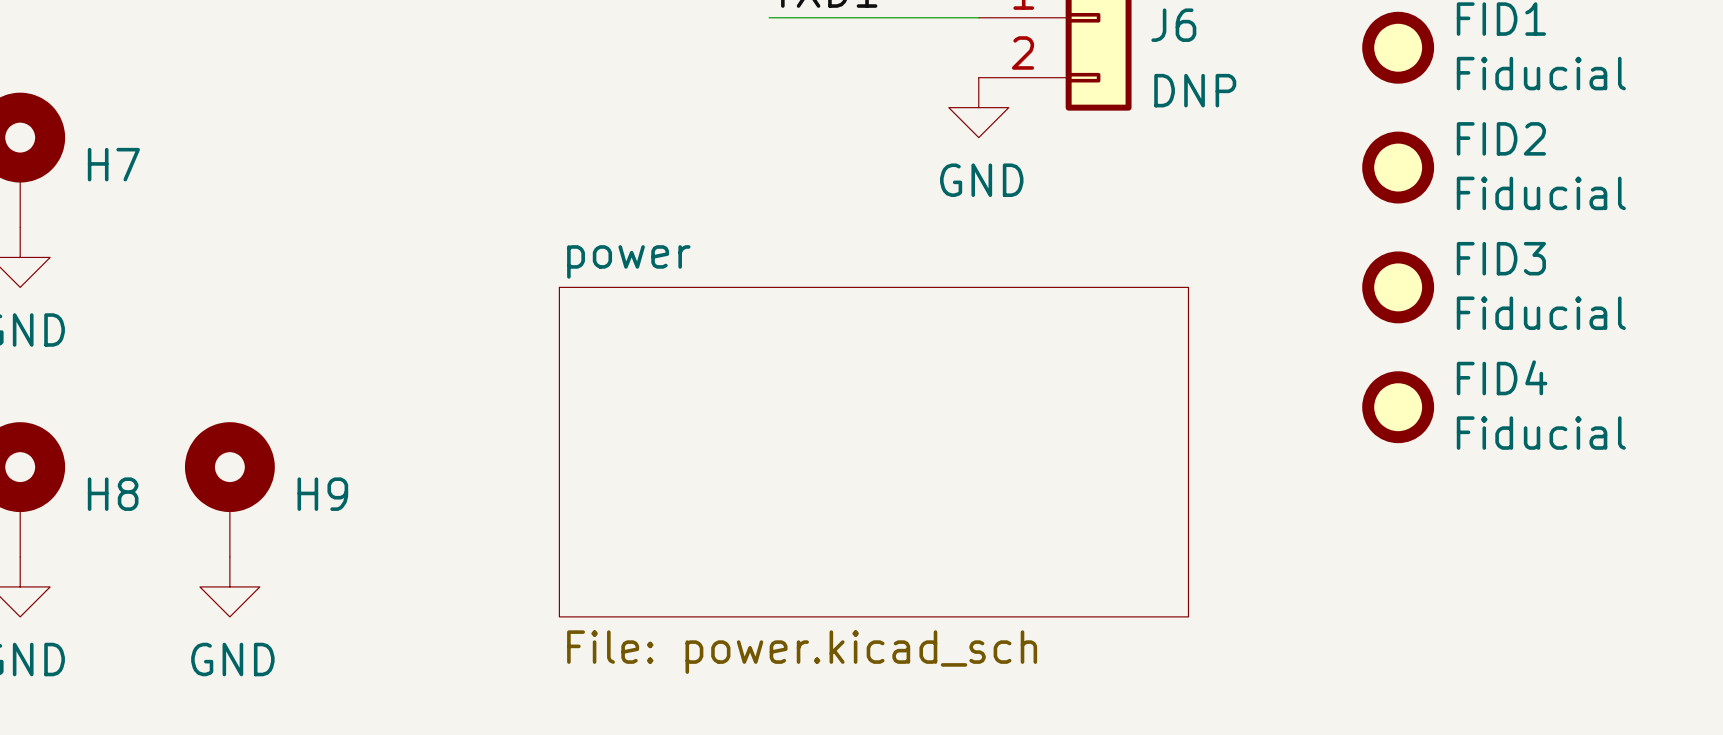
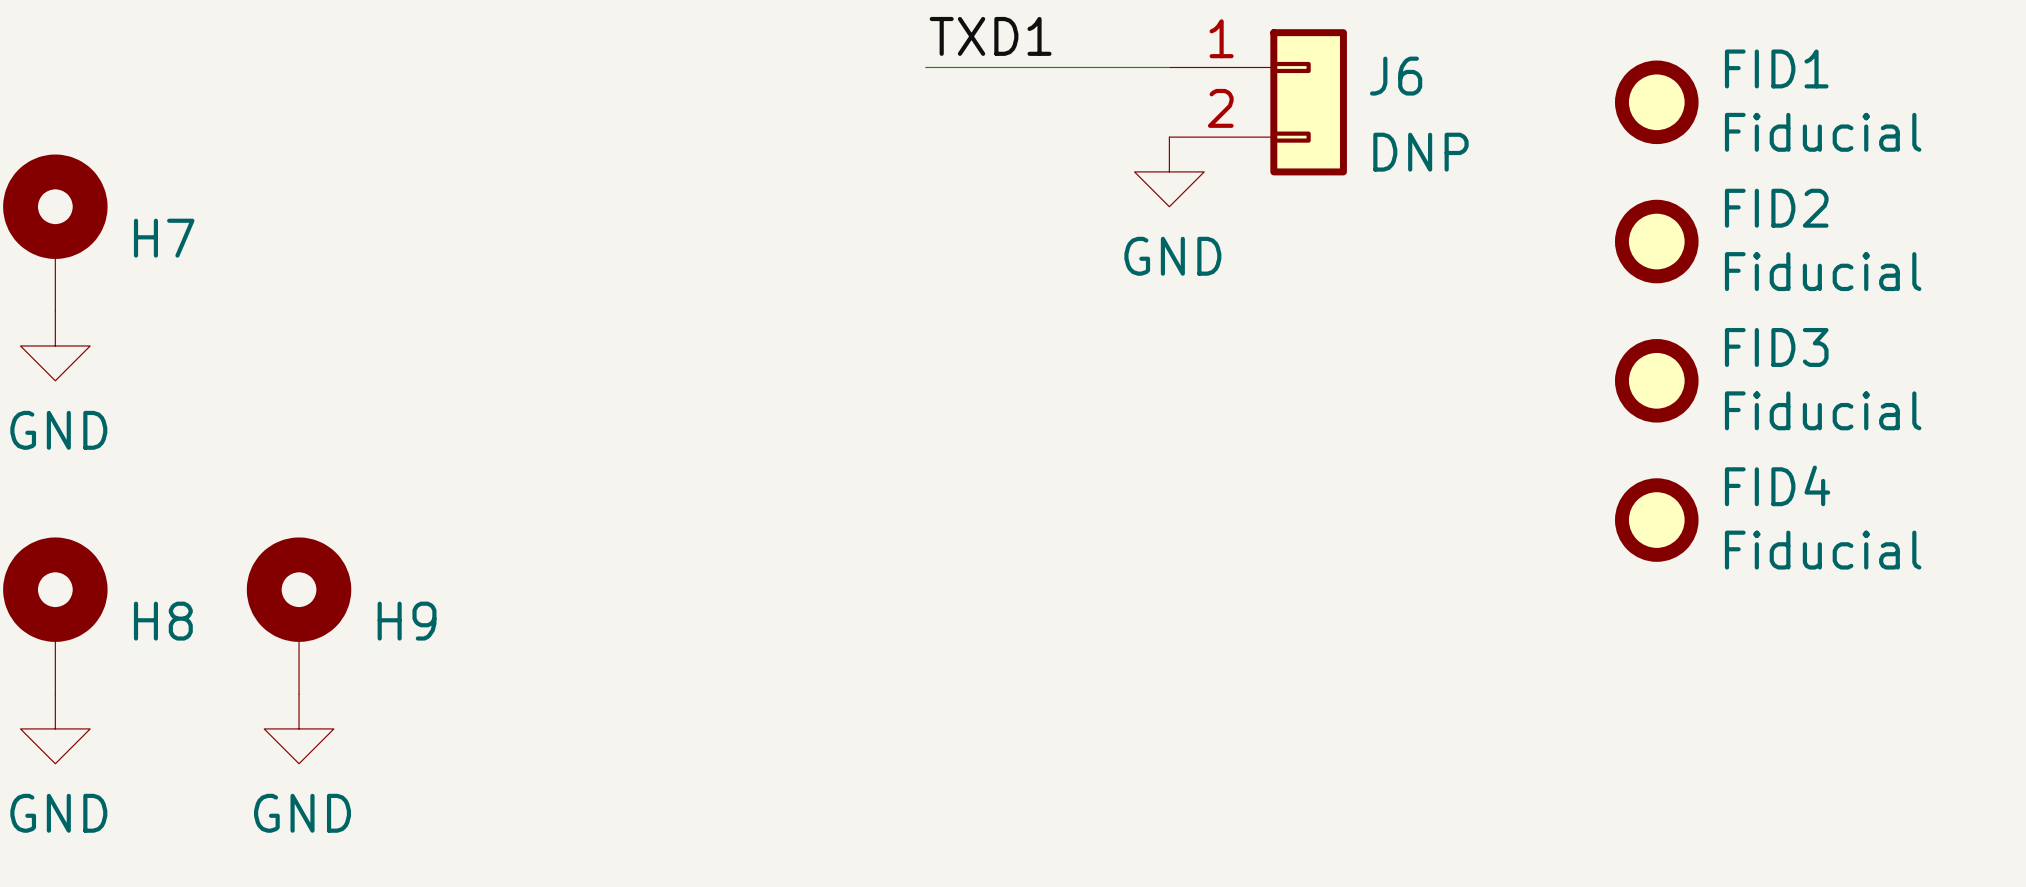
sheet power: File: power.kicad_sch (873, 452) -> none

